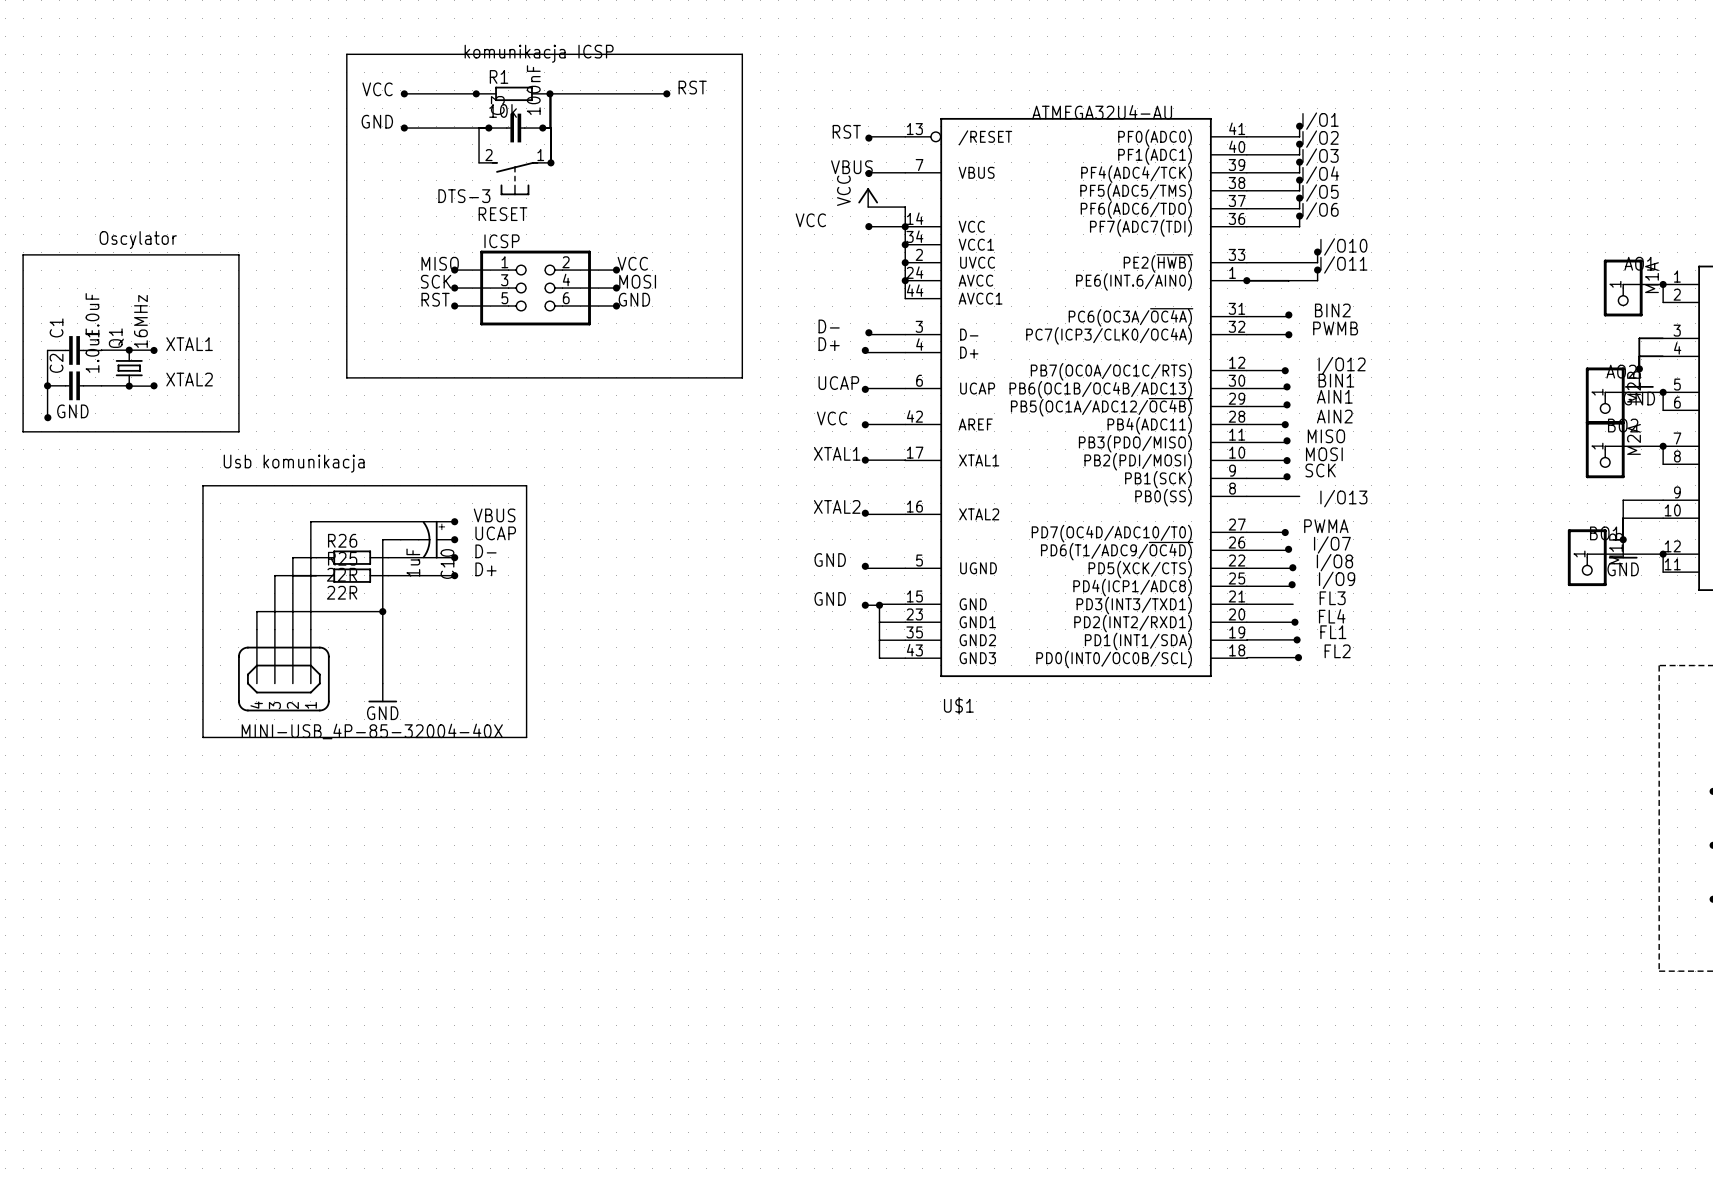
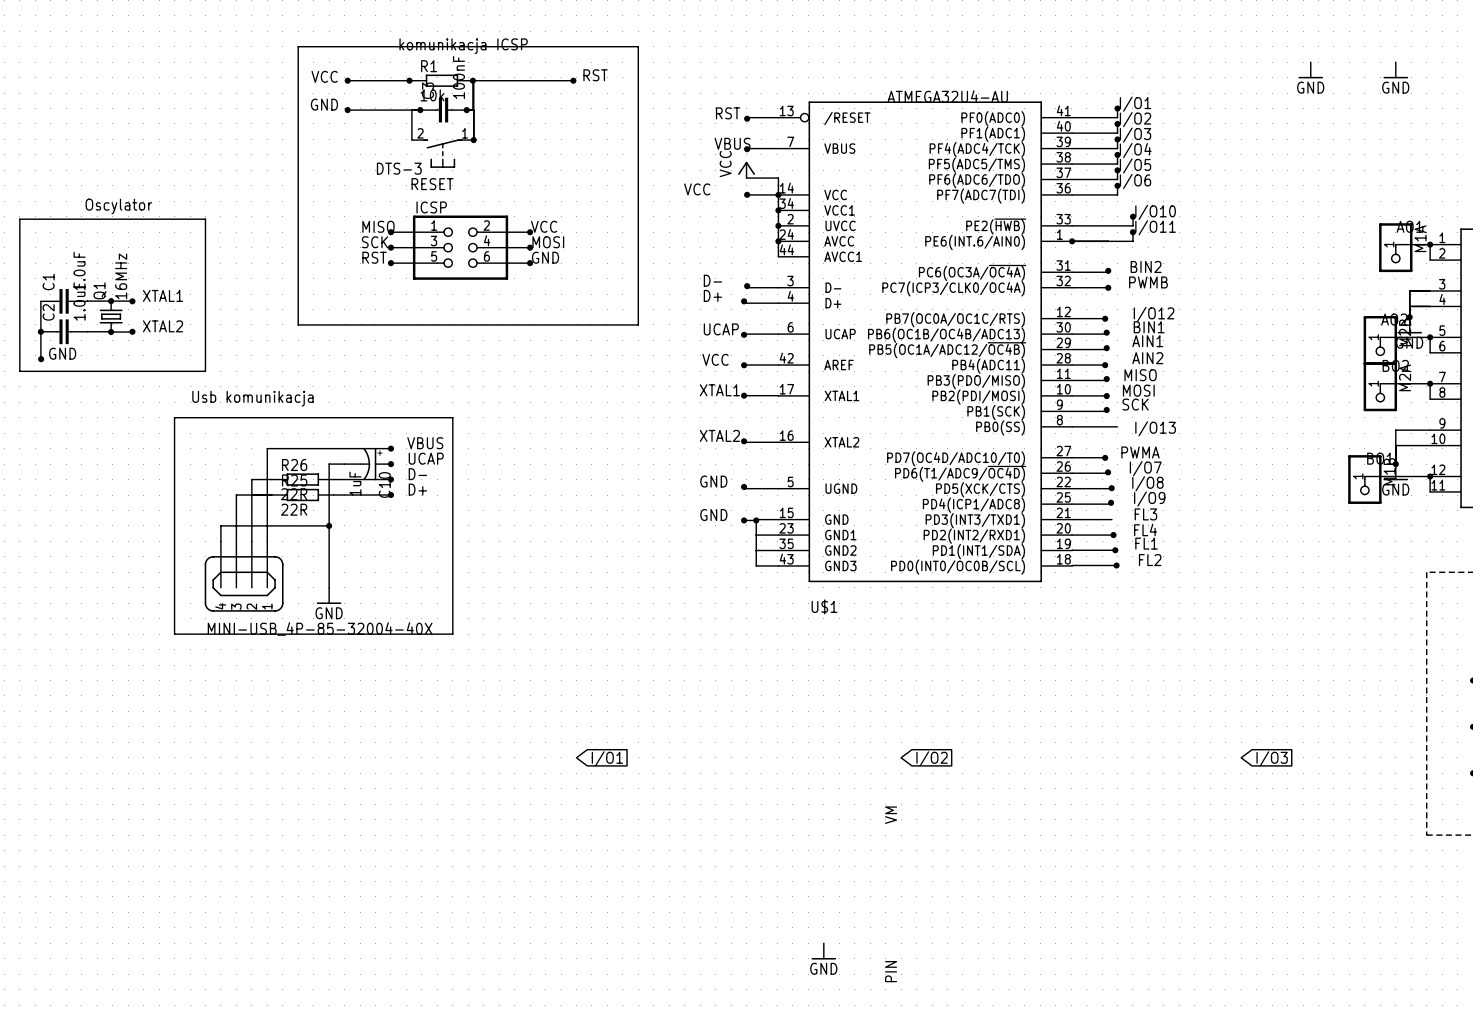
power symbol: none -> GND (1310, 70)
power symbol: none -> GND (1395, 70)
global label: none -> I/O1 (607, 758)
global label: none -> I/O2 (932, 758)
global label: none -> I/O3 (1272, 758)
label: none -> VM (891, 815)
power symbol: none -> GND (823, 951)
label: none -> PIN (891, 971)

